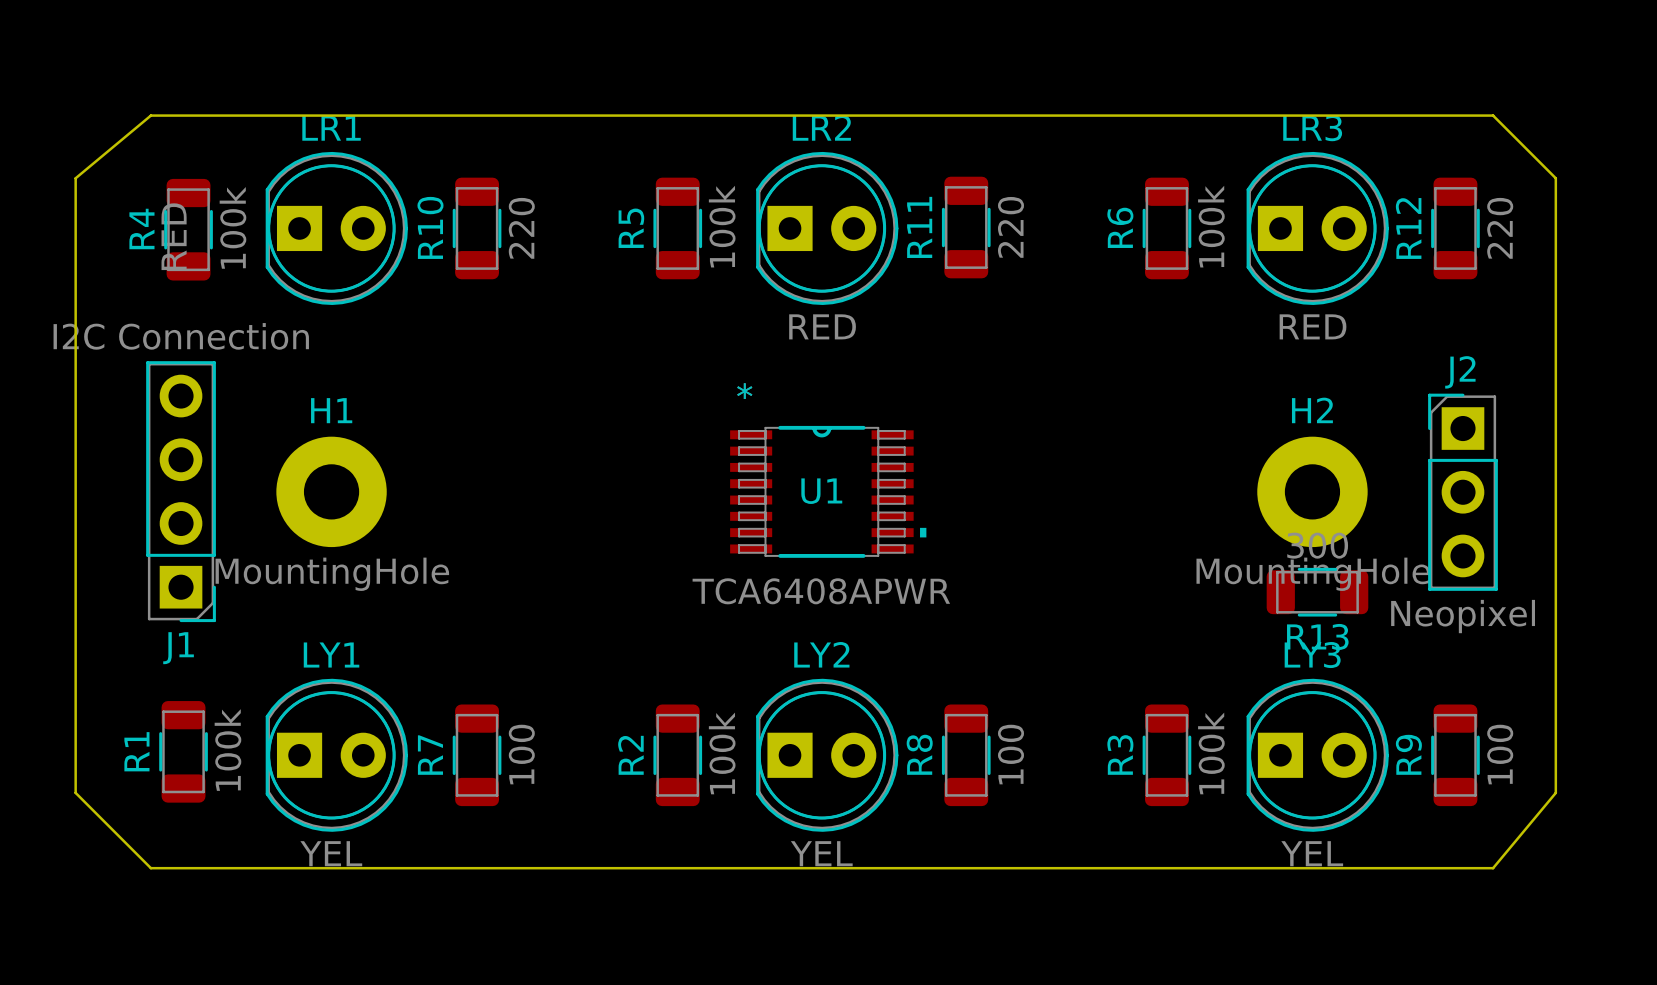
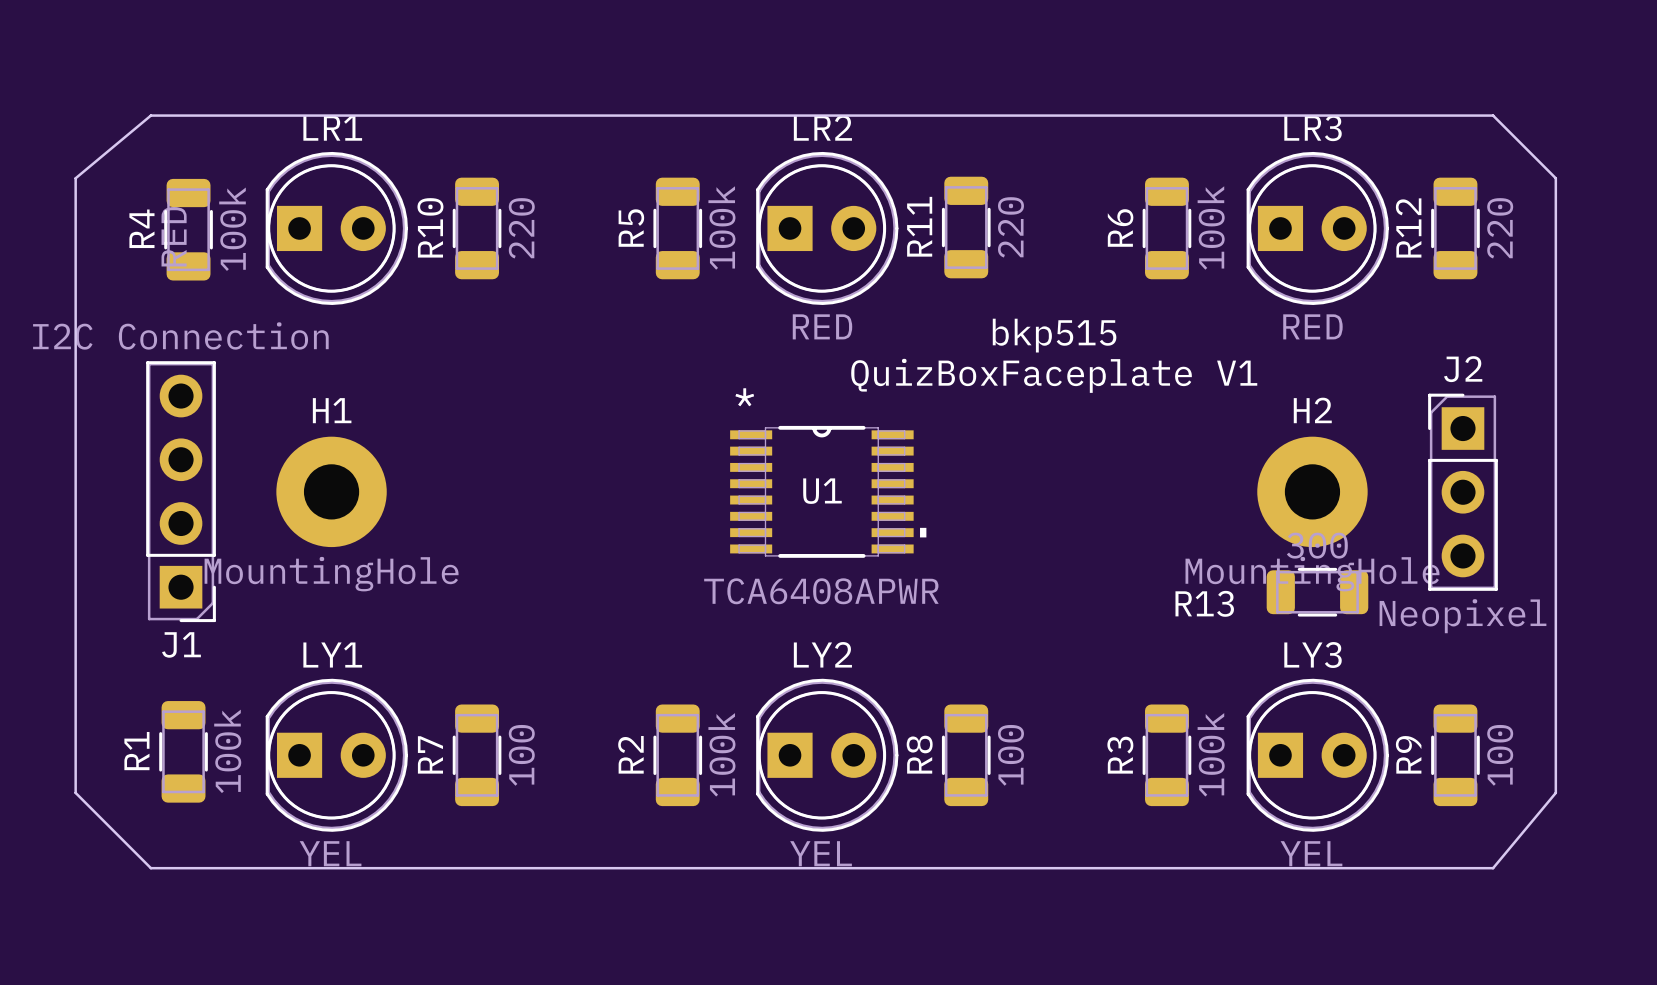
text: none -> bkp515 (1054, 335)
text: none -> QuizBoxFaceplate V1 (1054, 375)
R13 name position: R13 (1317, 636) -> R13 (1204, 603)

